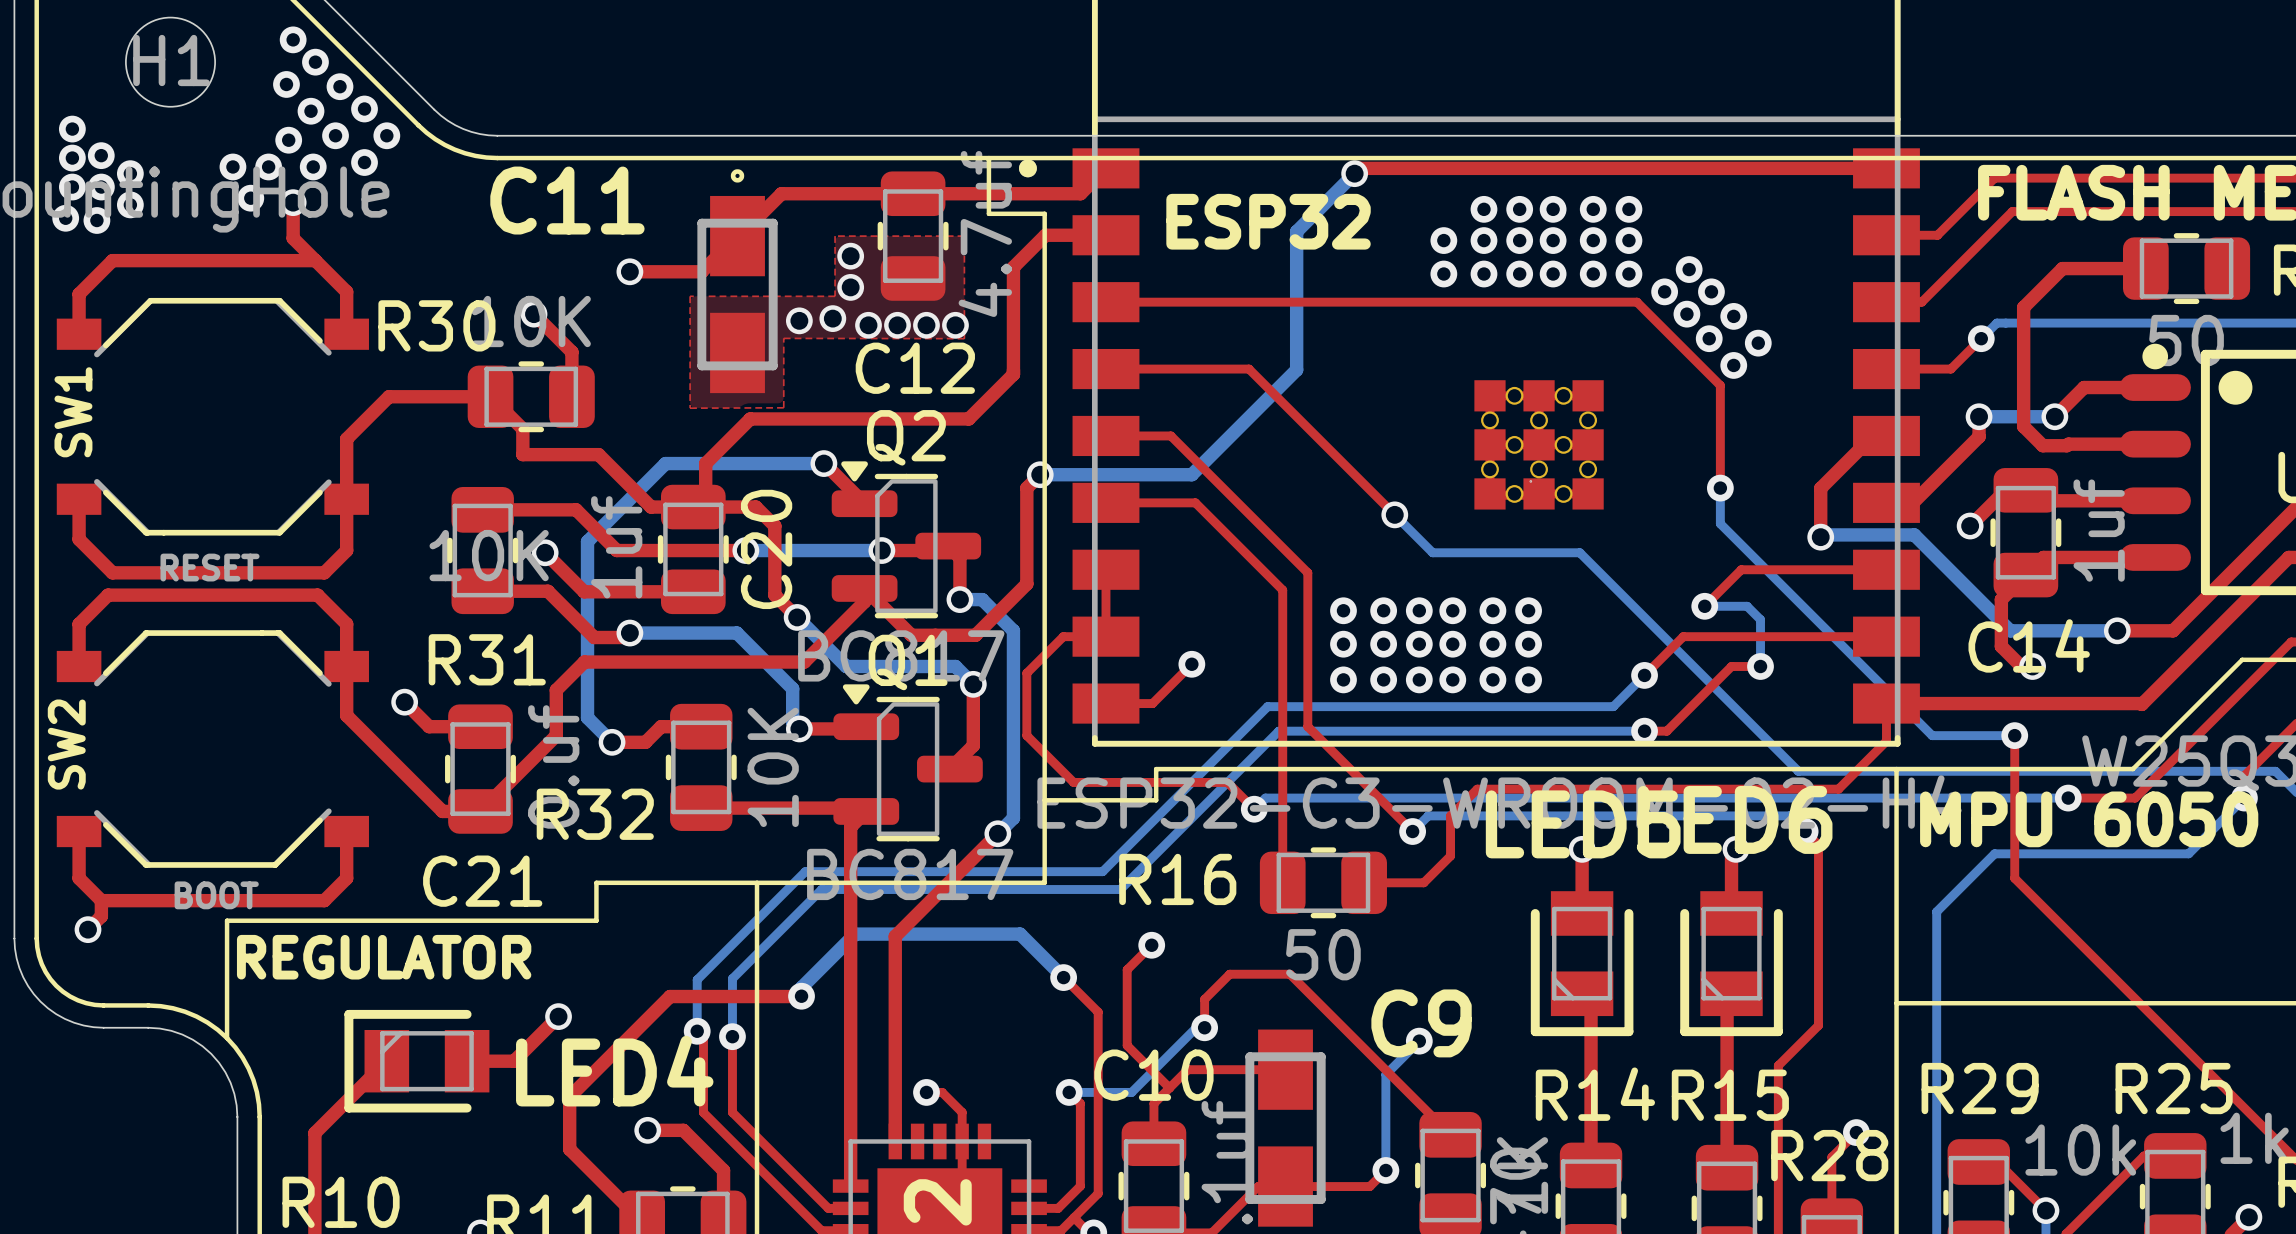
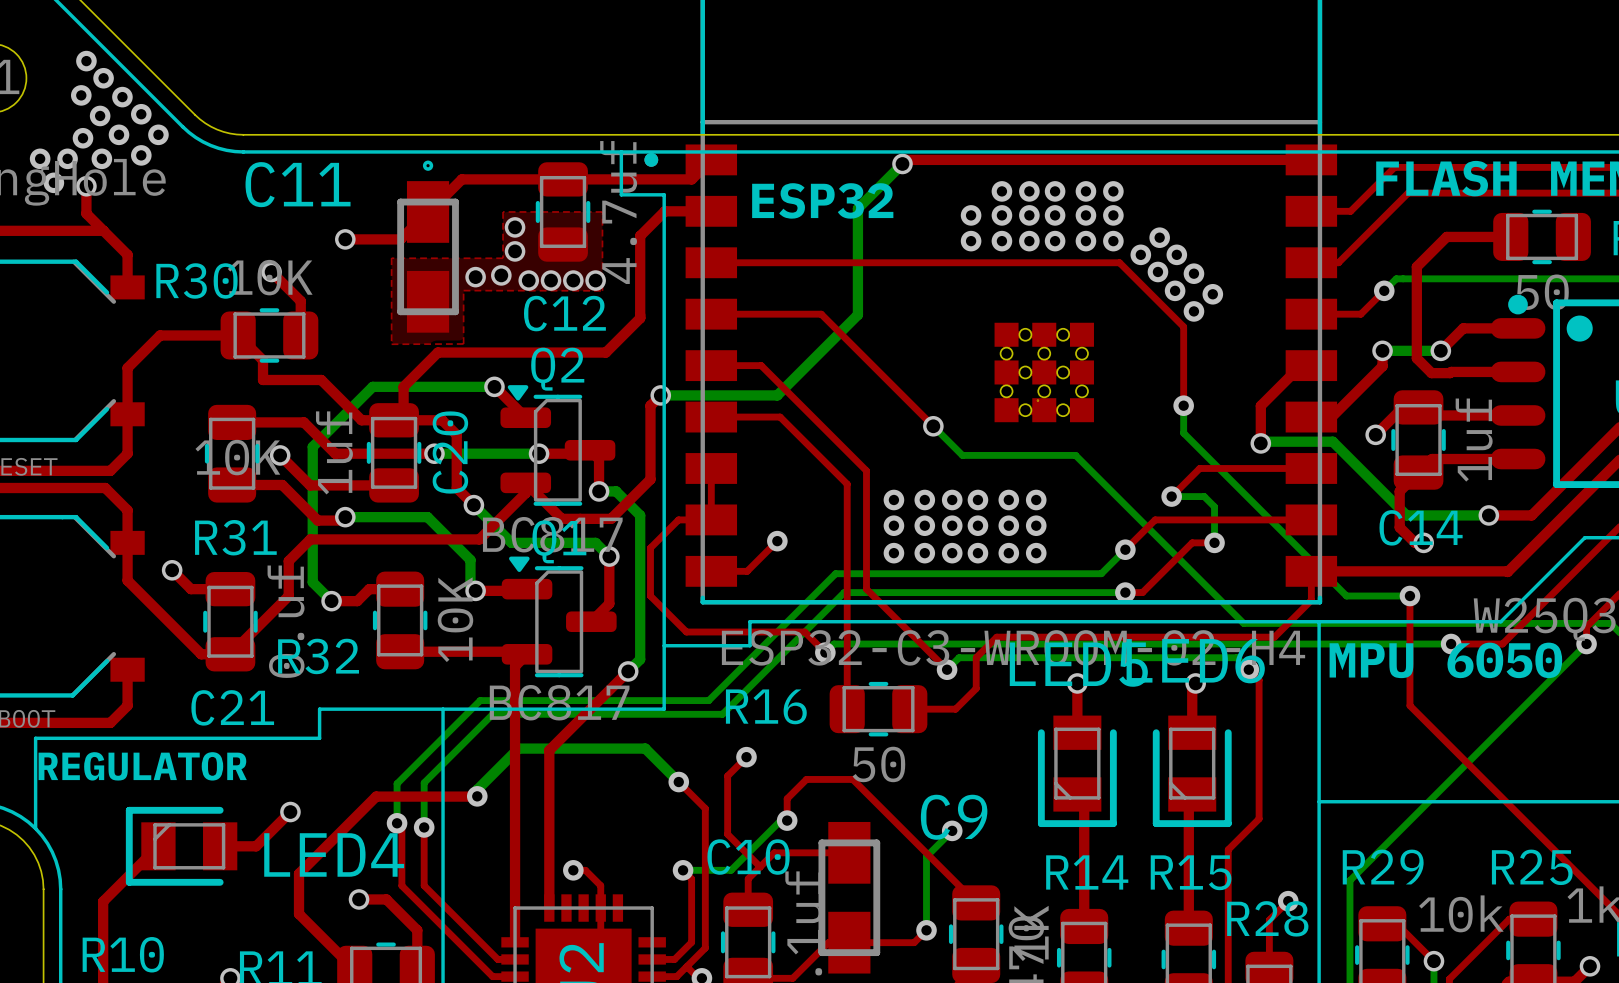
bottom track: (2188, 853) (1994, 853) (1936, 911) (1936, 1105) -> (1543, 686) (1349, 880)

